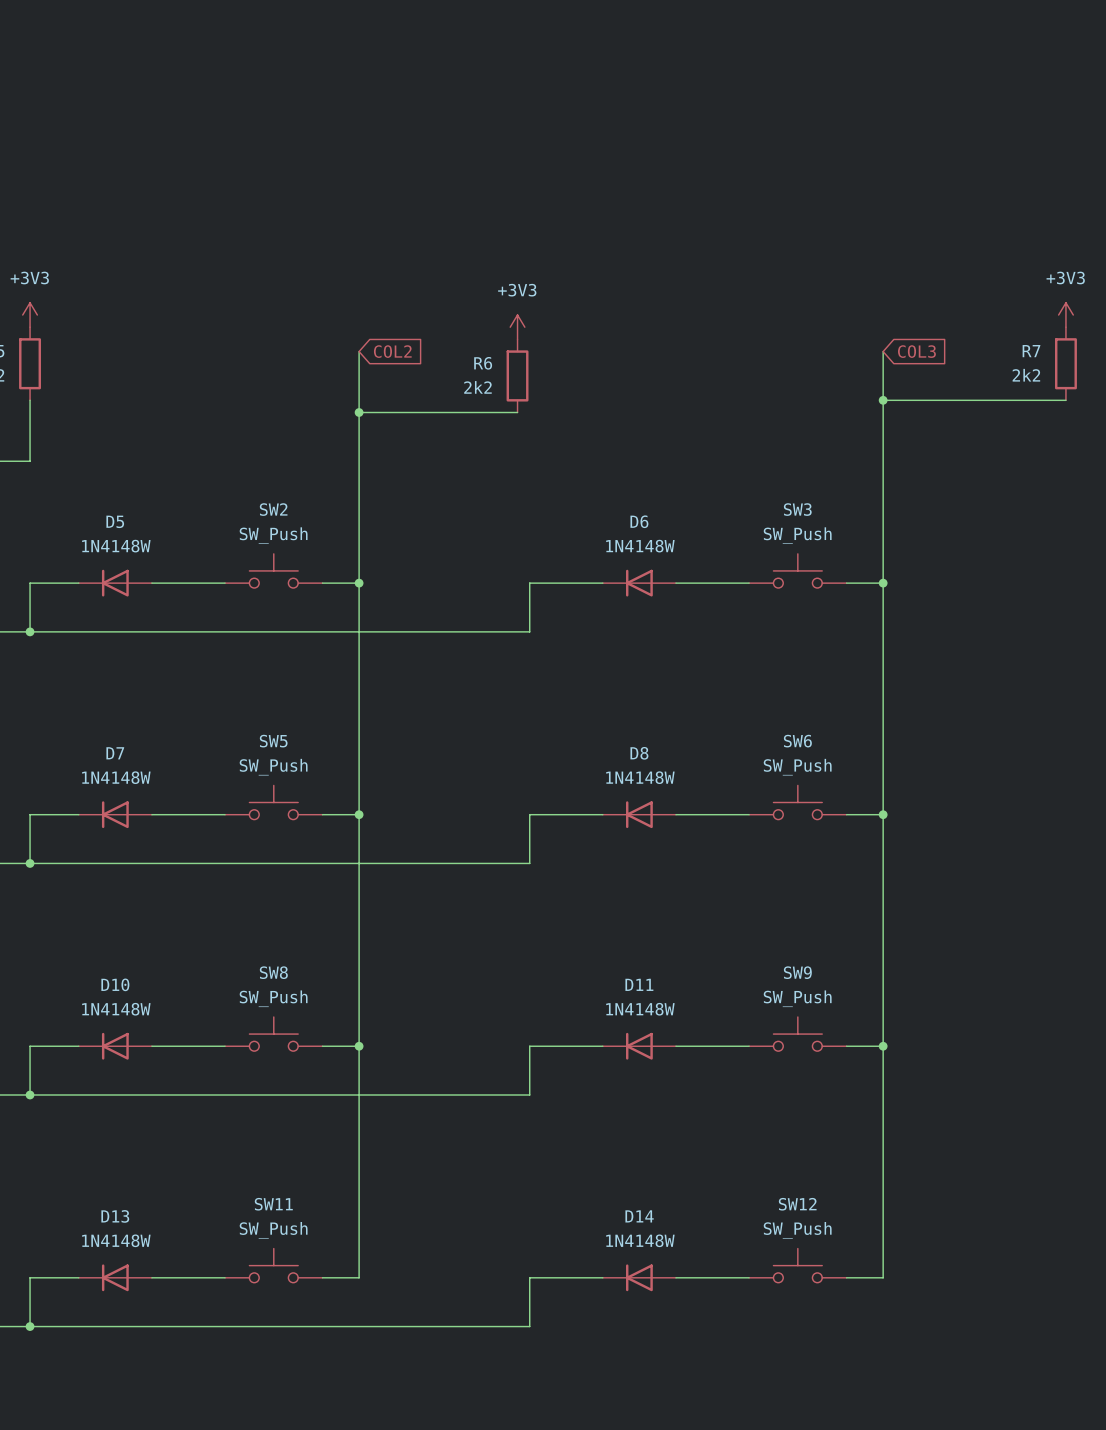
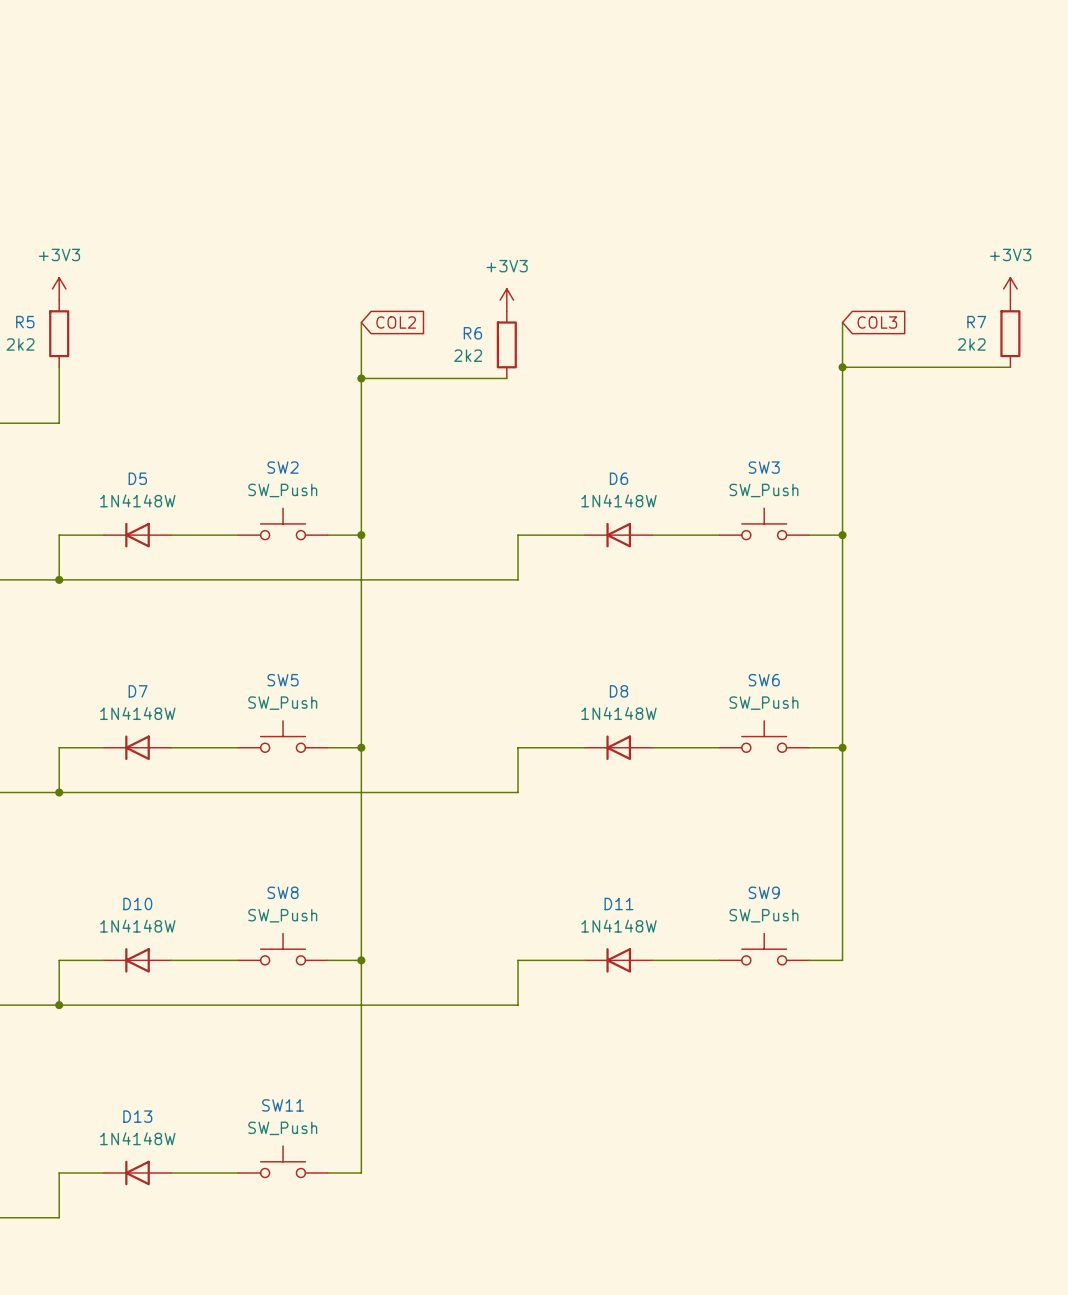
wire: (883, 1046) (883, 1277) (846, 1277) -> none
junction: (883, 1046) -> none
SW12: SW_Push (797, 1265) -> none
wire: (602, 1277) (529, 1277) (529, 1326) (30, 1326) -> none
D14: 1N4148W (639, 1277) -> none
wire: (675, 1277) (749, 1277) -> none
junction: (30, 1326) -> none

